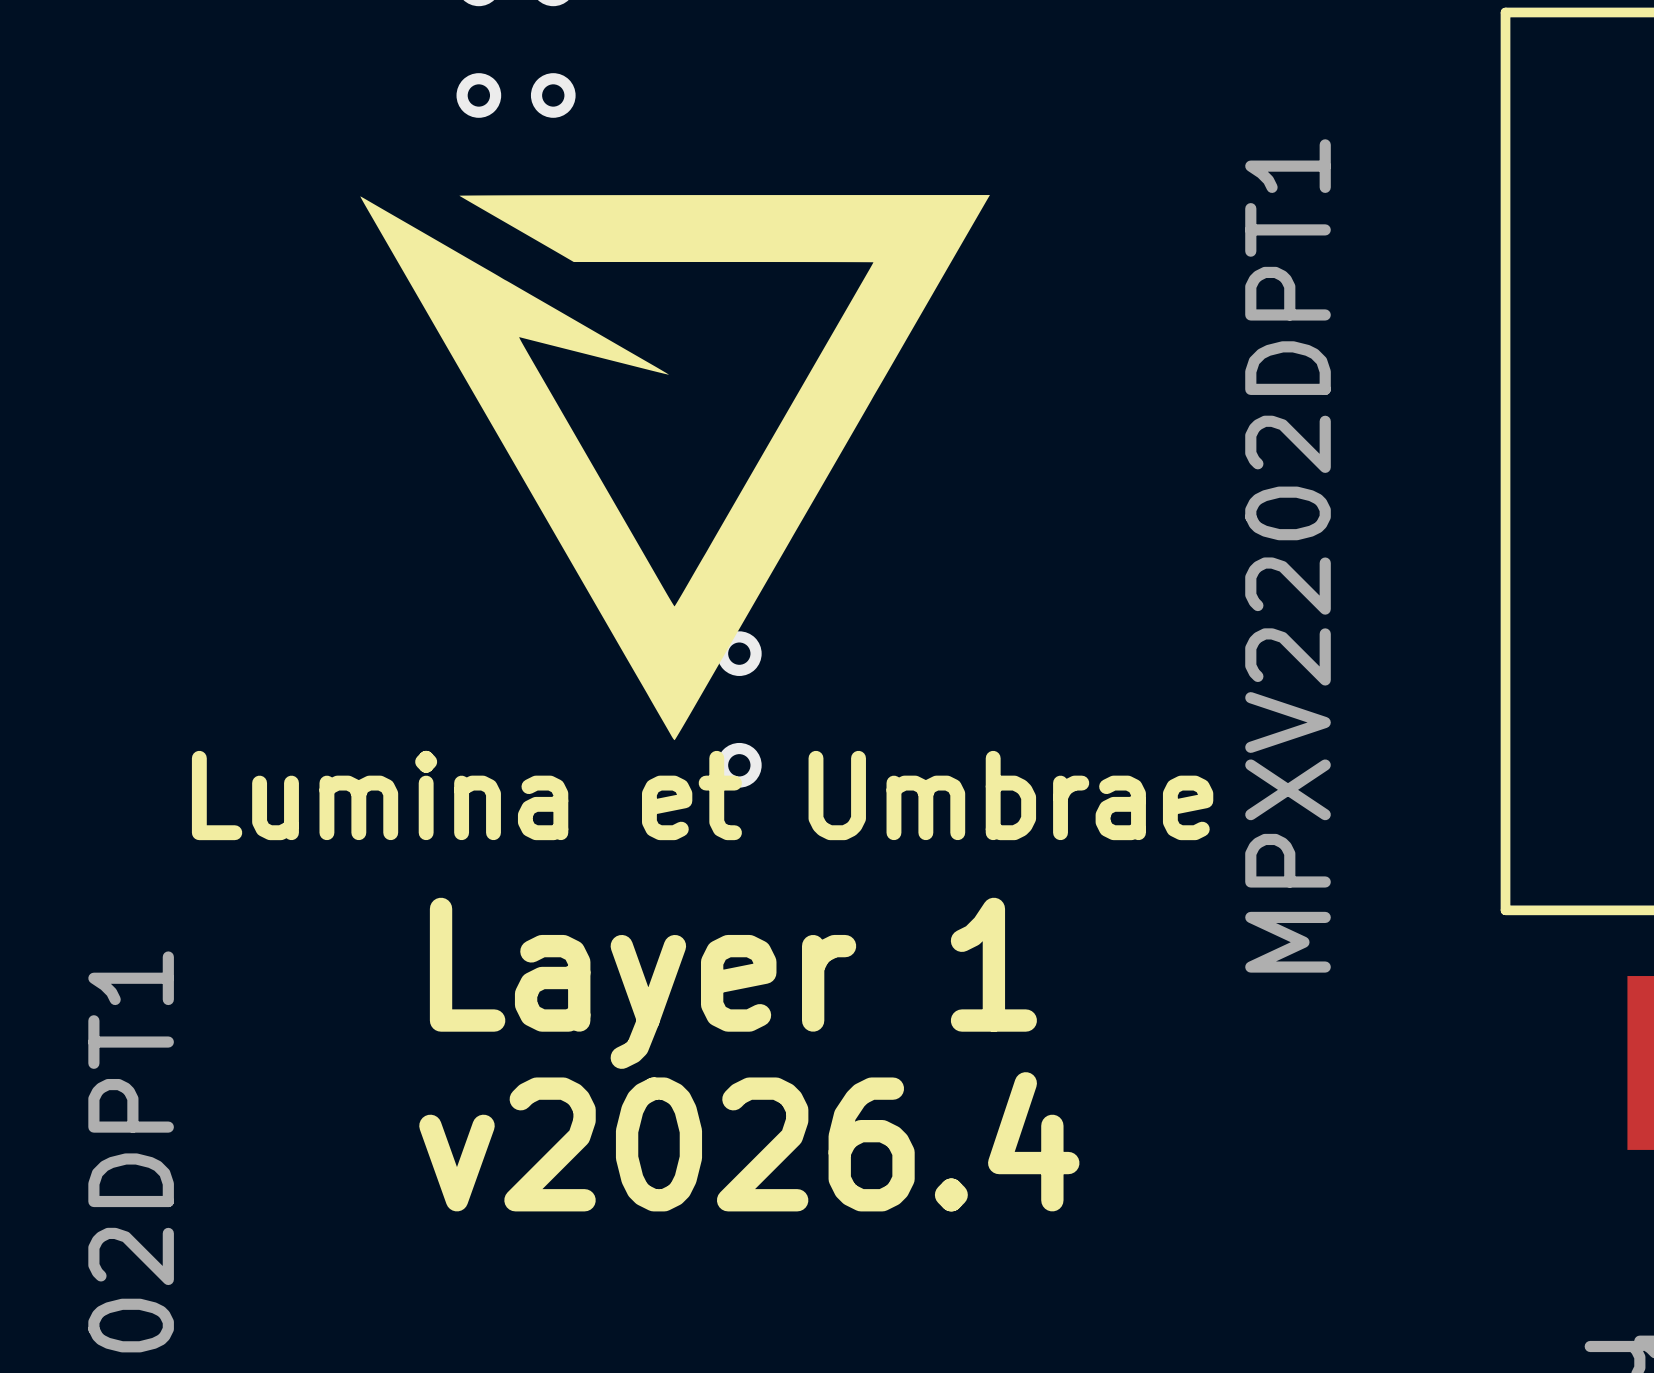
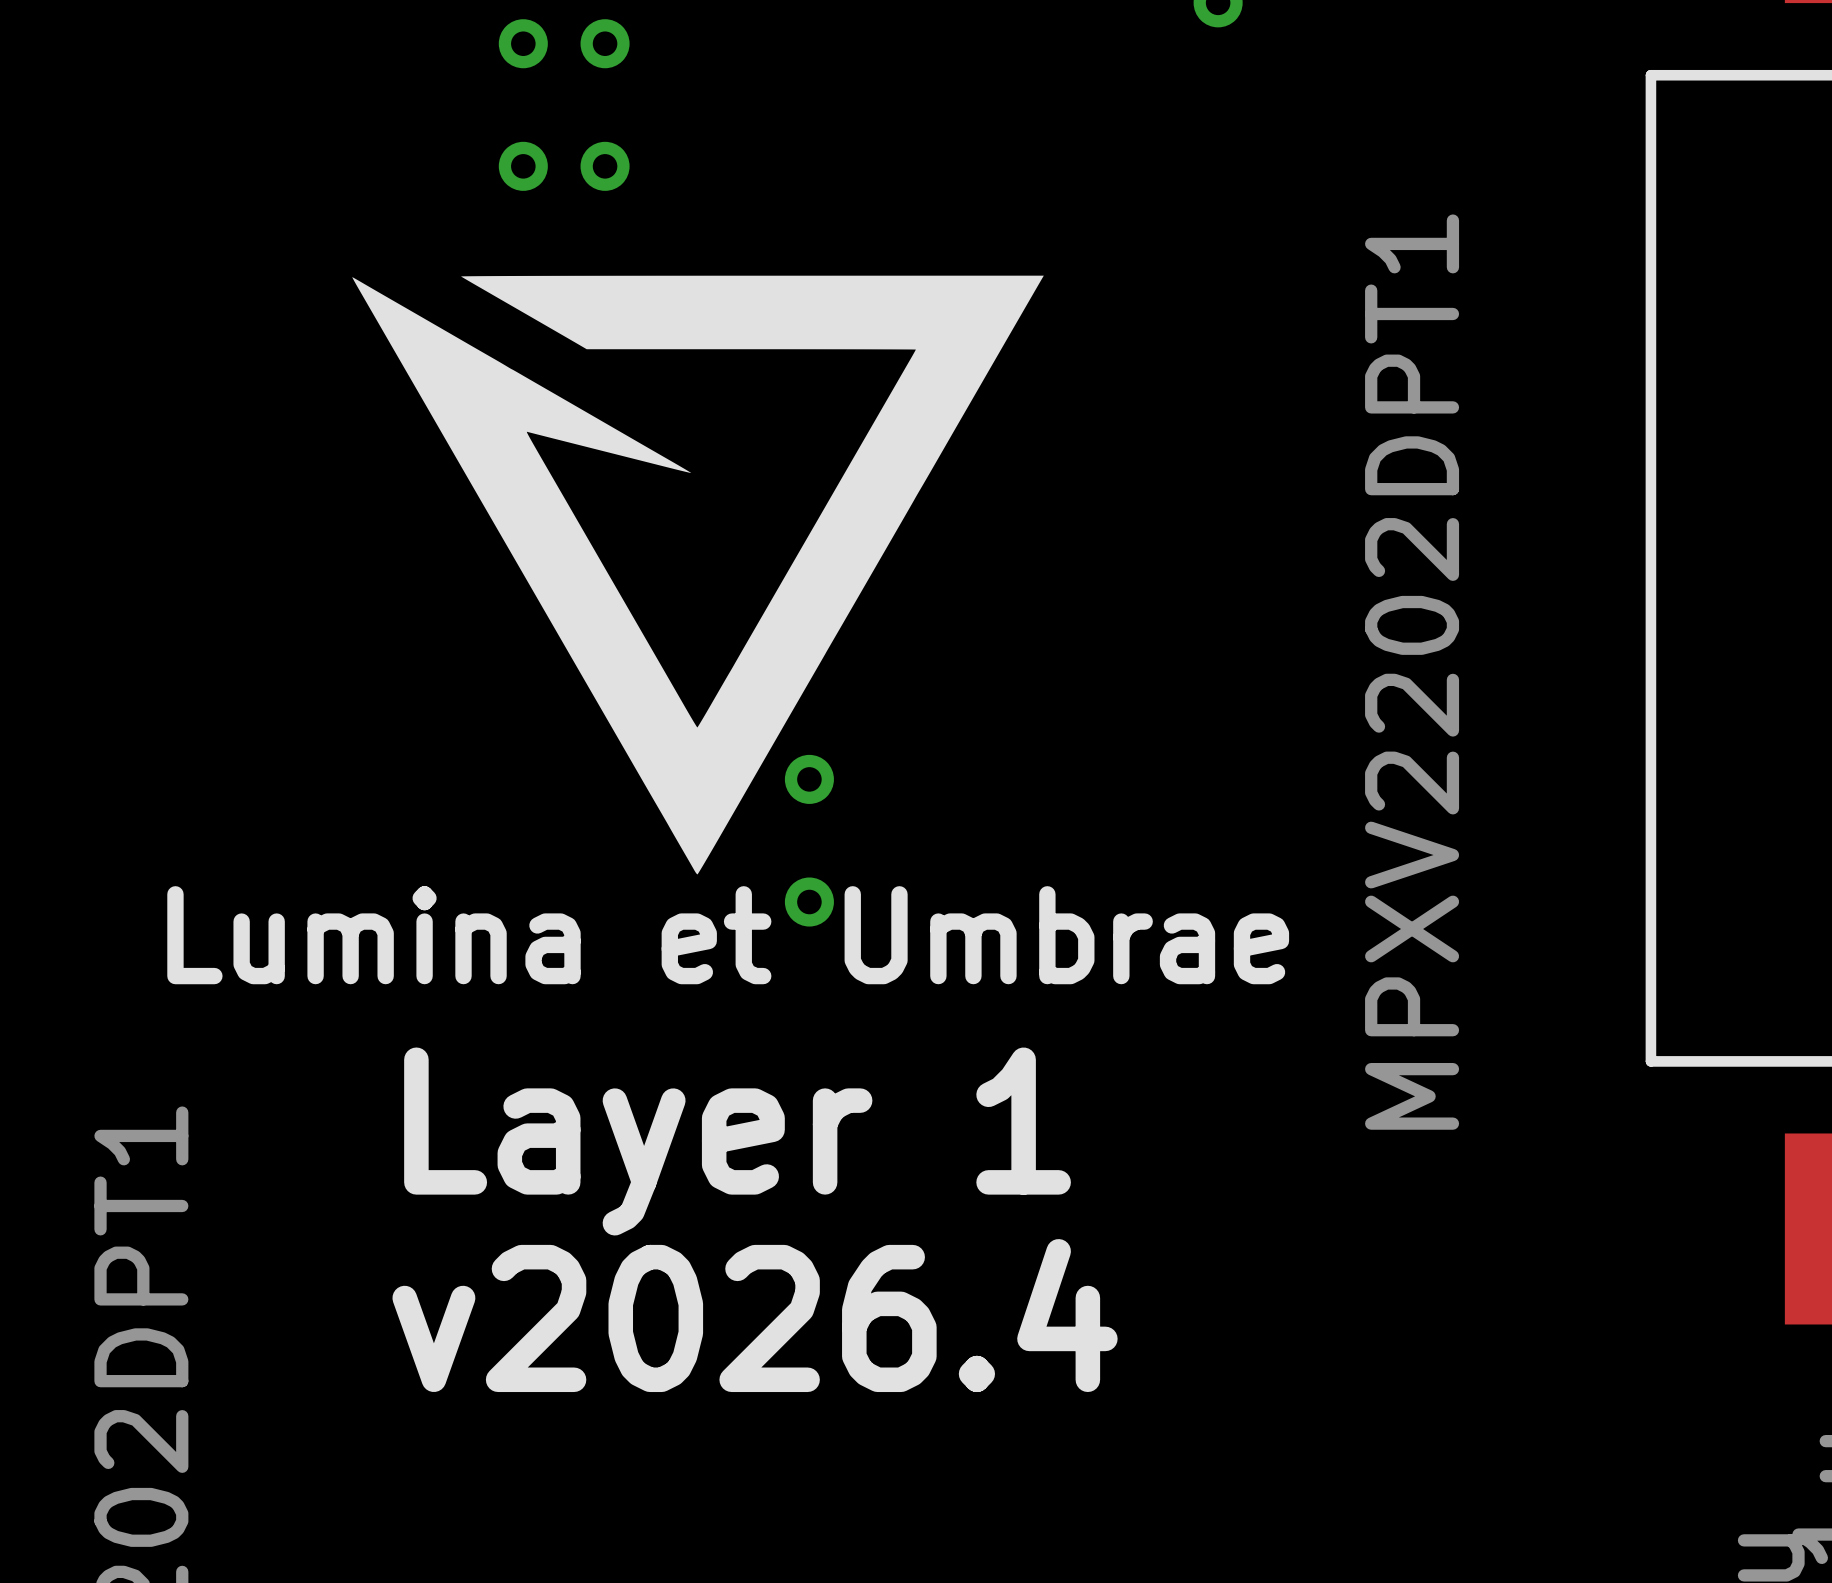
drawing position: (675, 467) -> (698, 575)
text position: Layer 1 (733, 983) -> Layer 1 (737, 1141)
text position: v2026.4 (749, 1141) -> v2026.4 (755, 1315)

